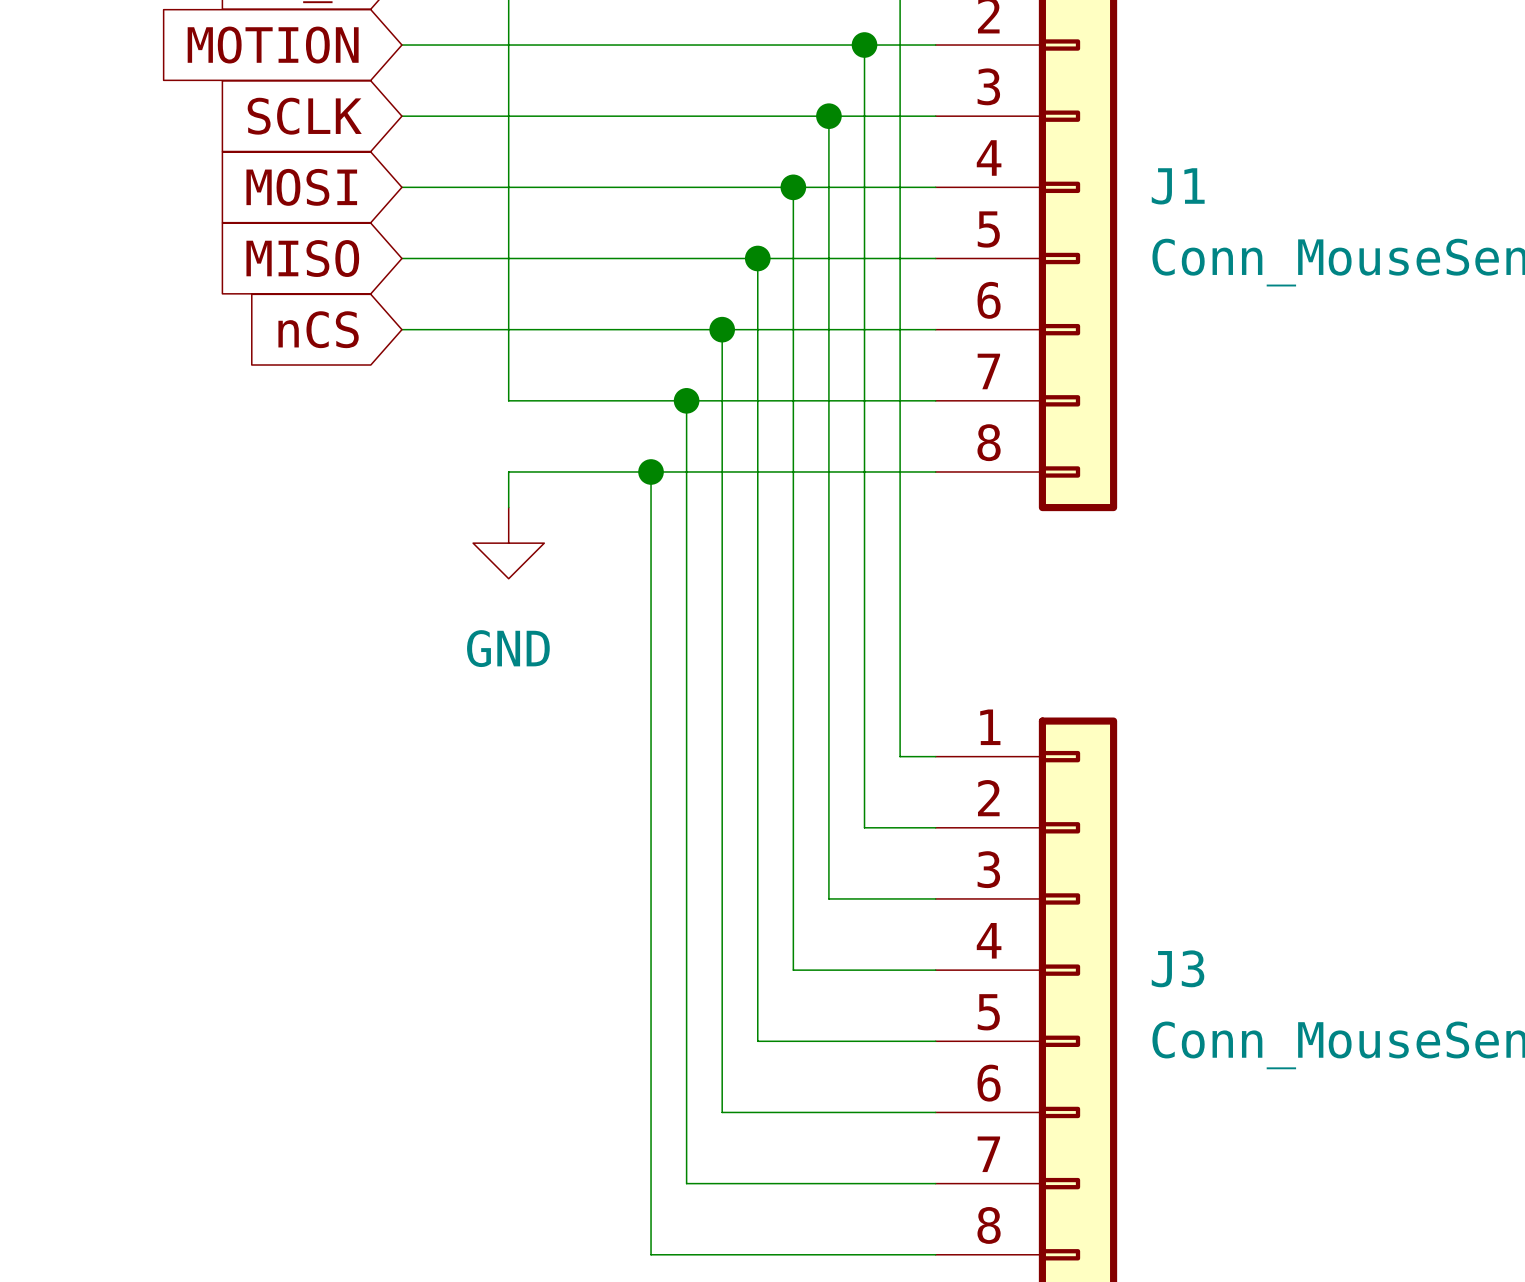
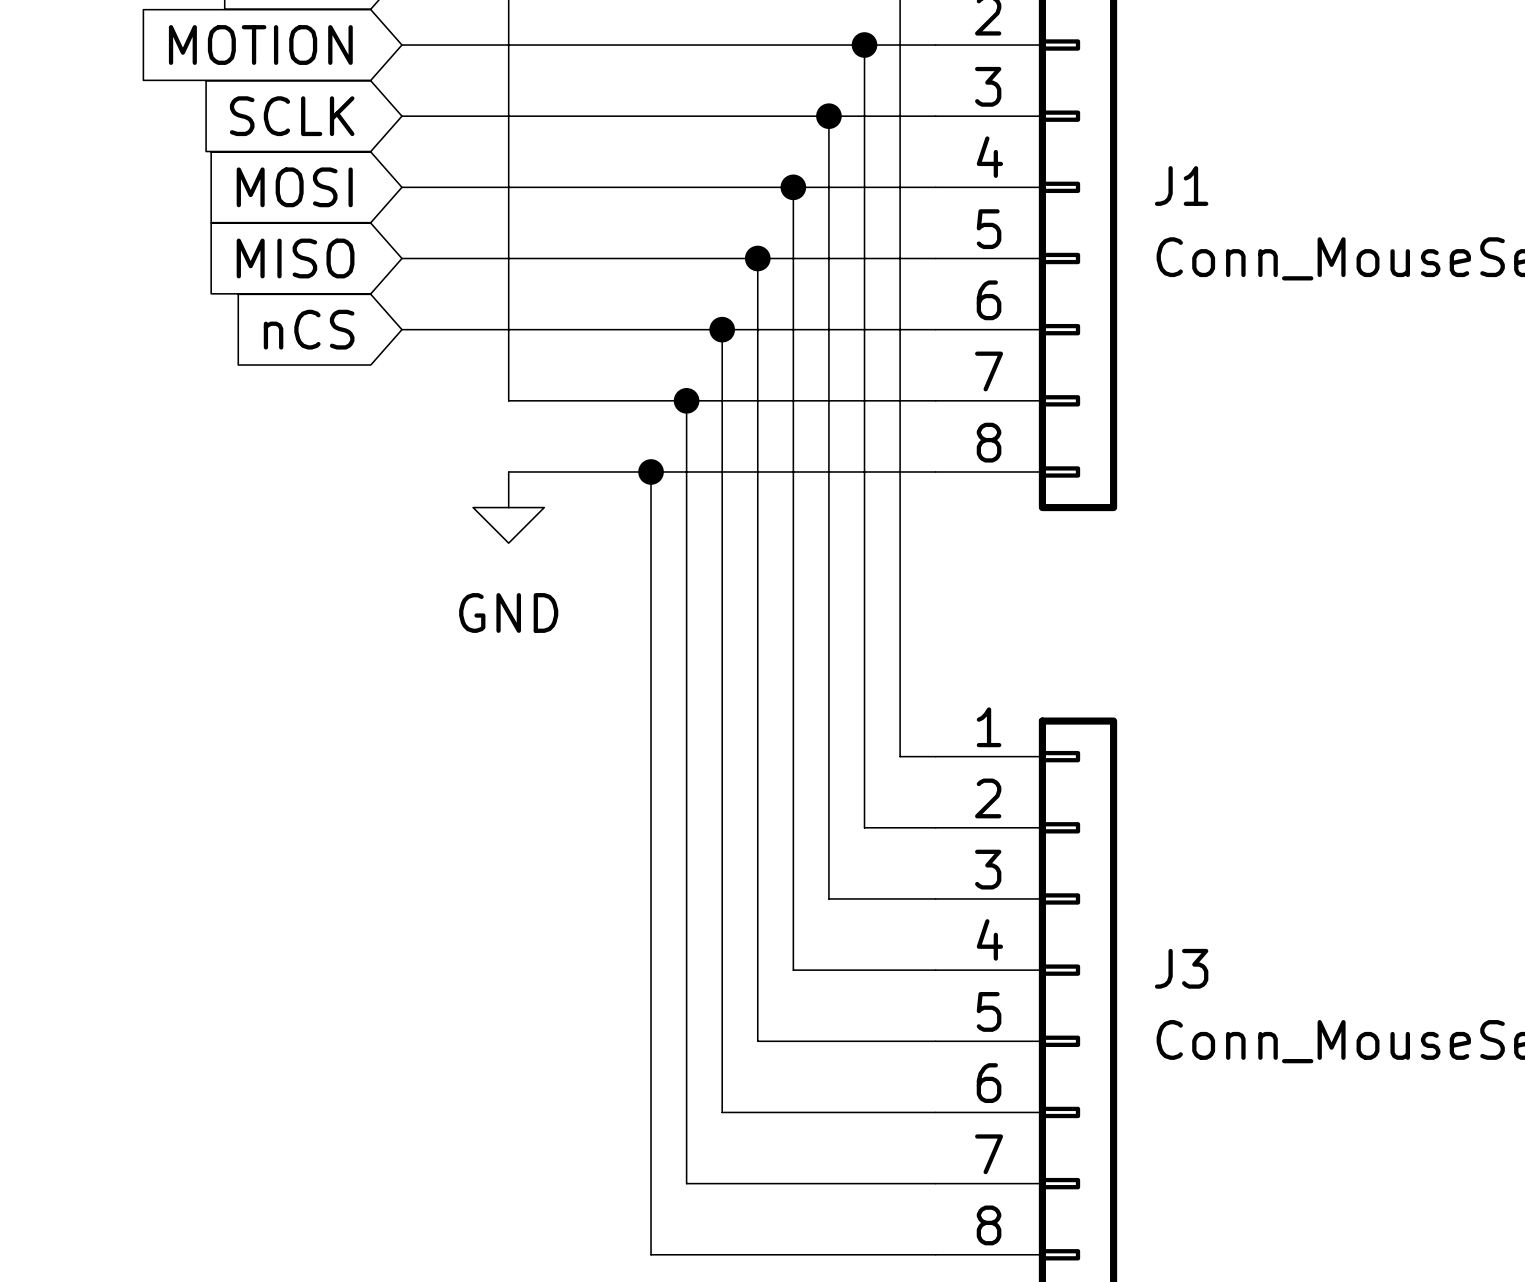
power symbol position: GND (508, 543) -> GND (508, 507)

